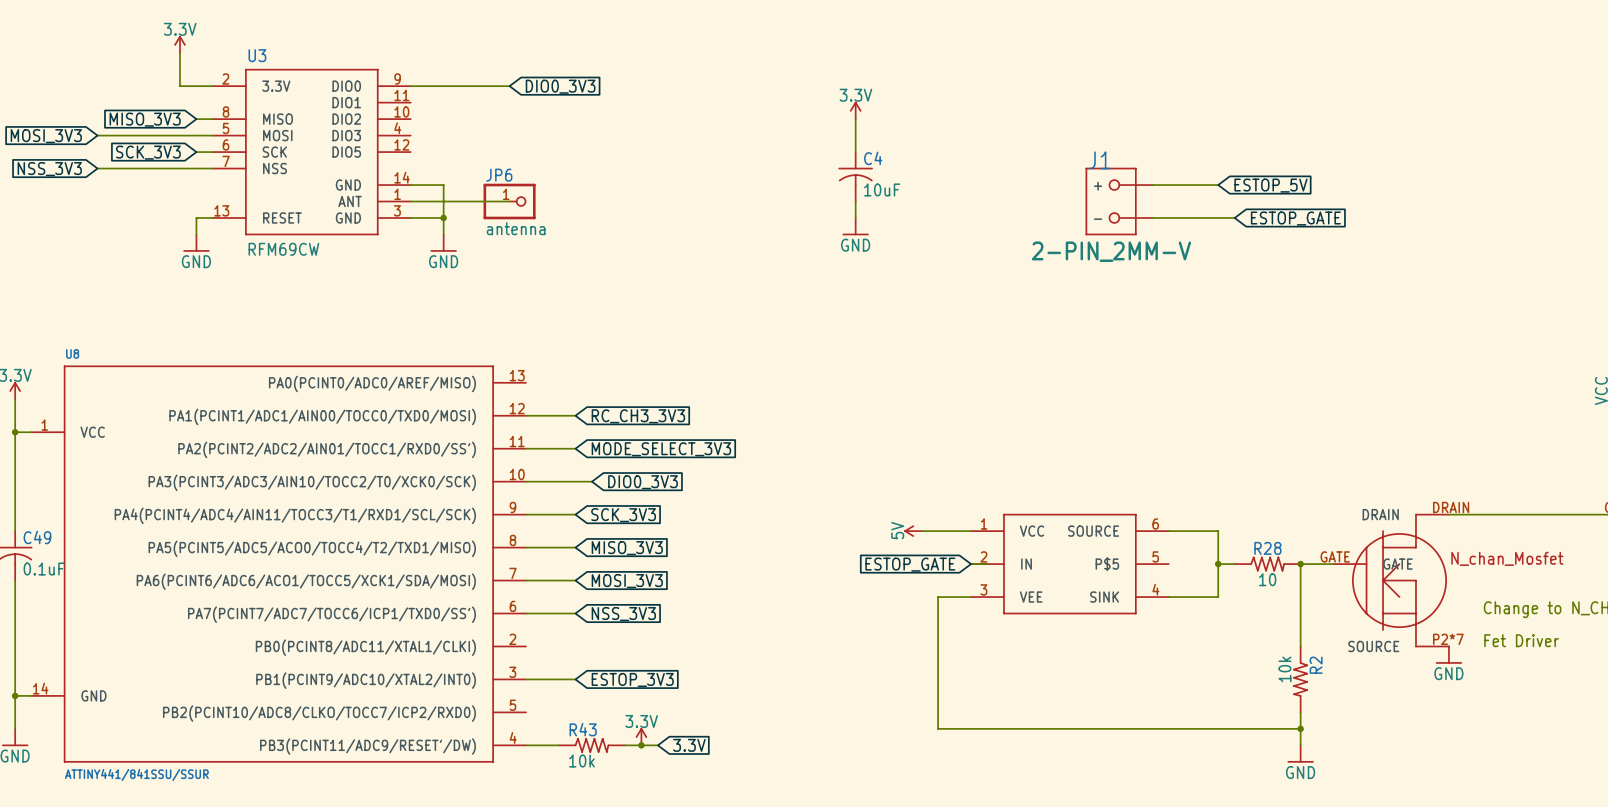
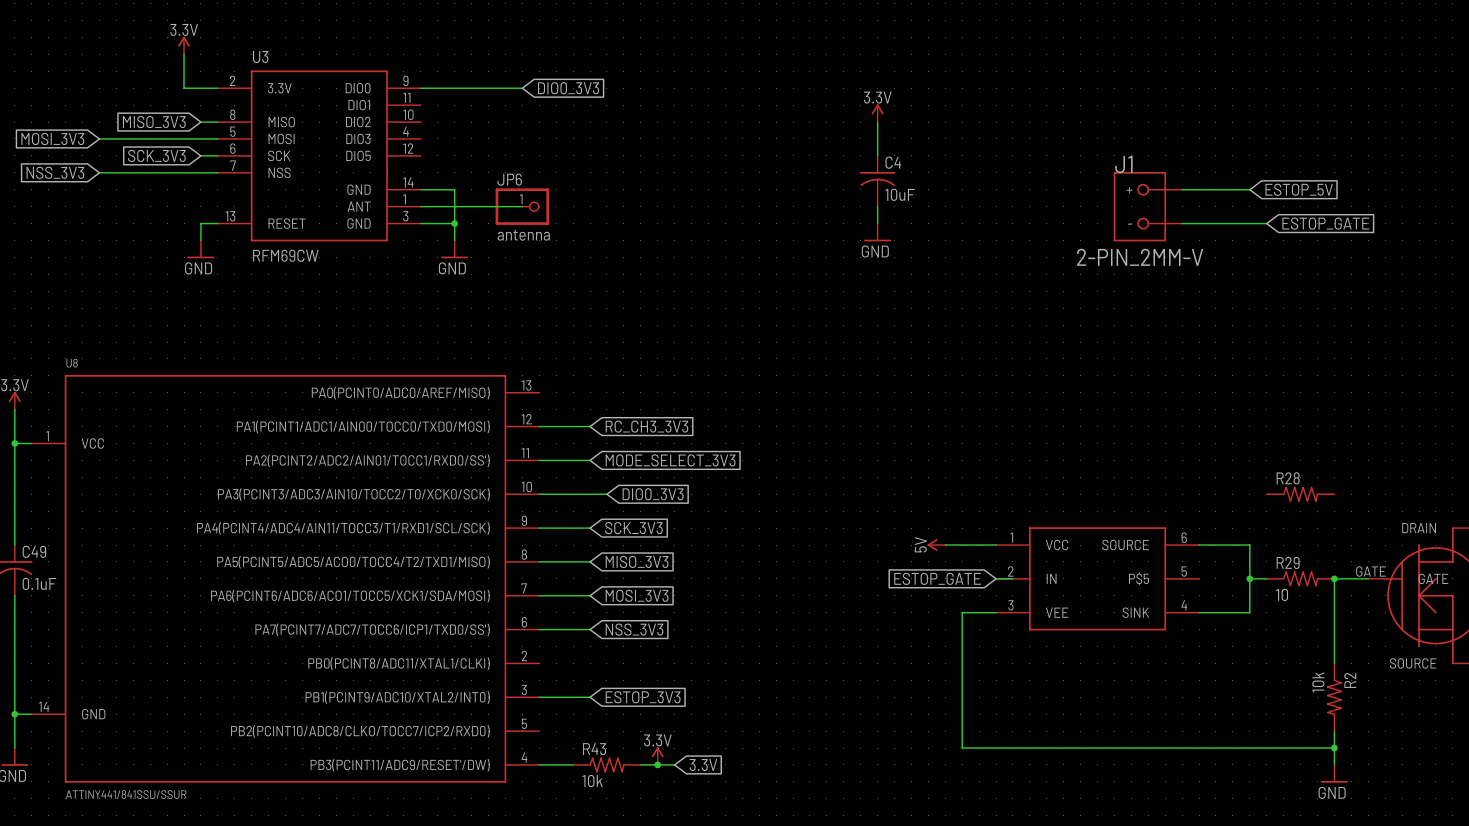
R28 symbol: [1234, 556, 1301, 572] -> [1266, 486, 1335, 502]
R29: none -> 10 (1300, 578)
R28 value: 10 (1267, 579) -> none

